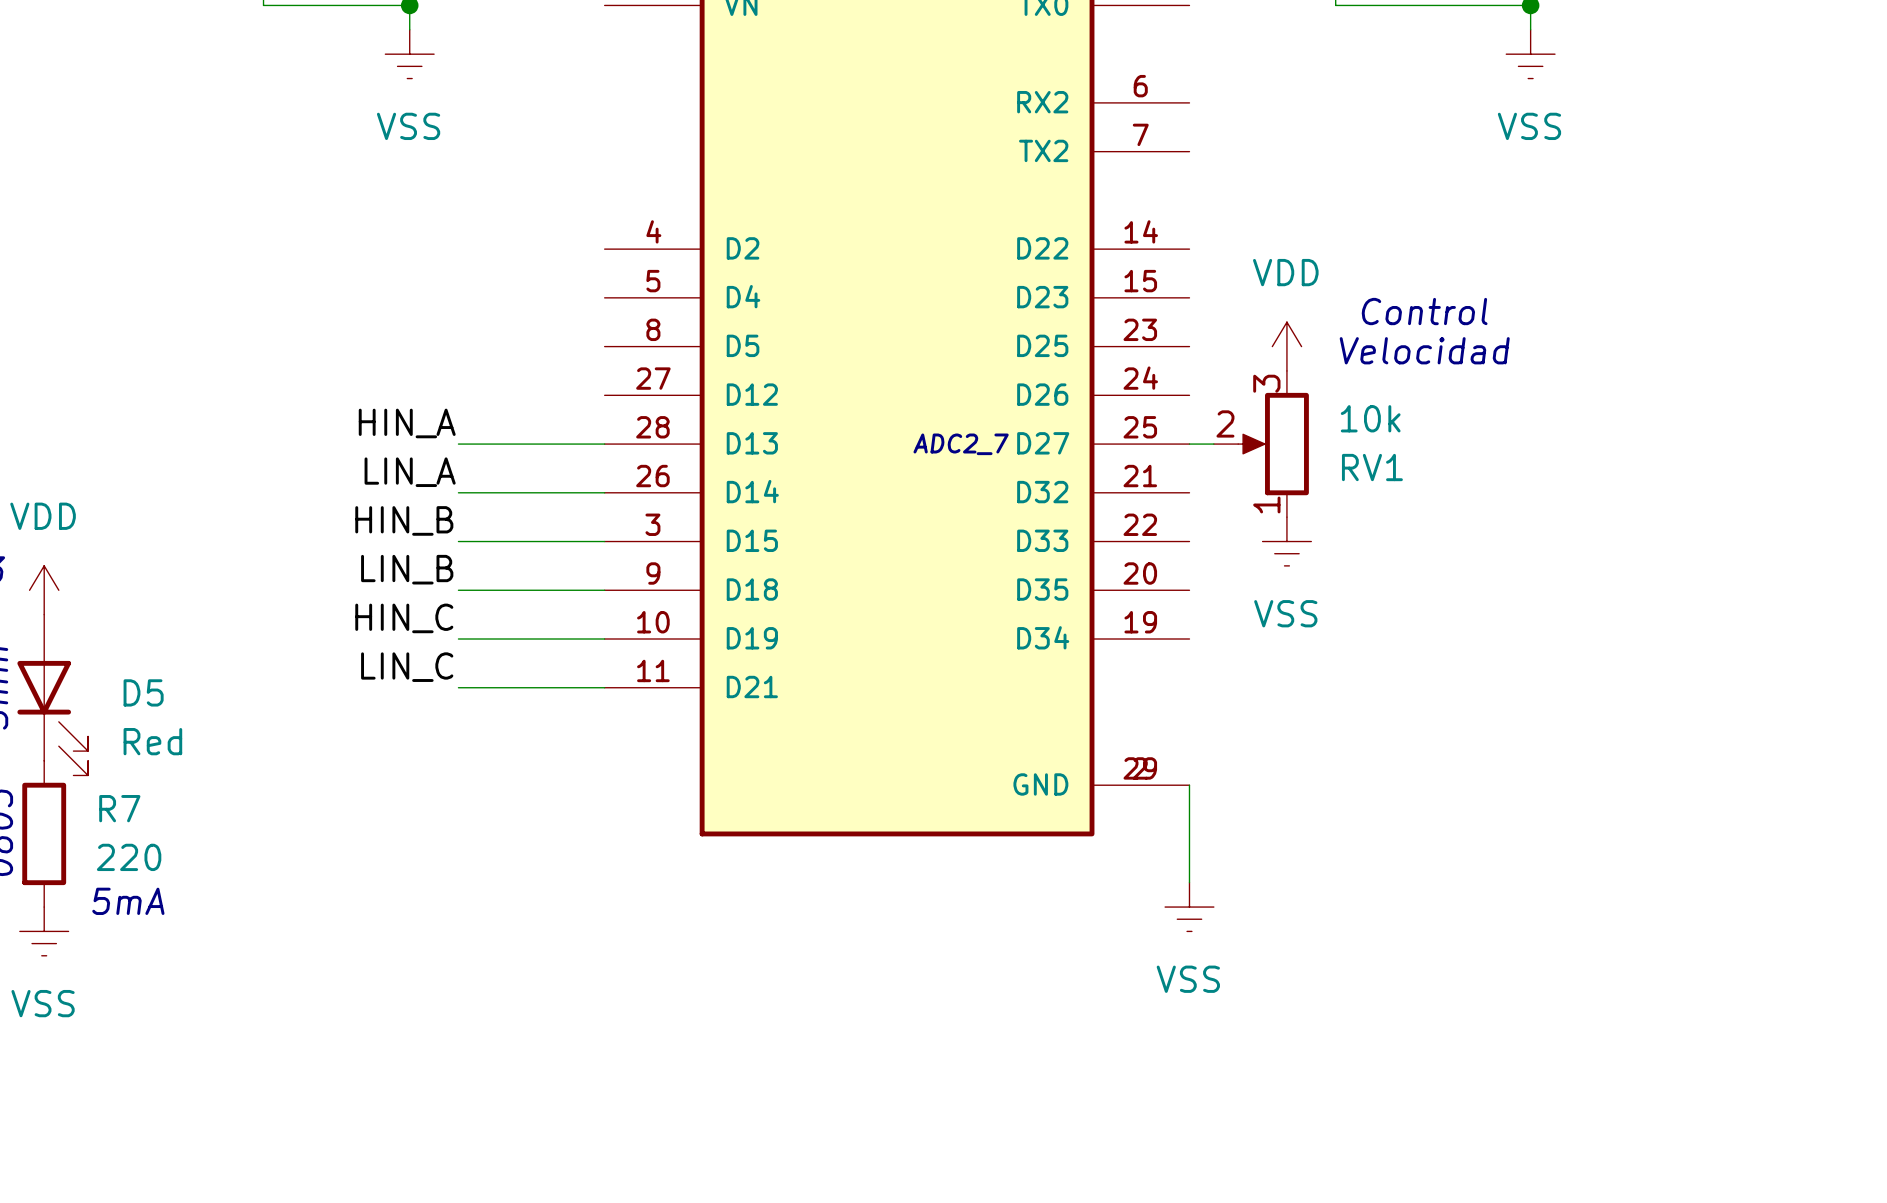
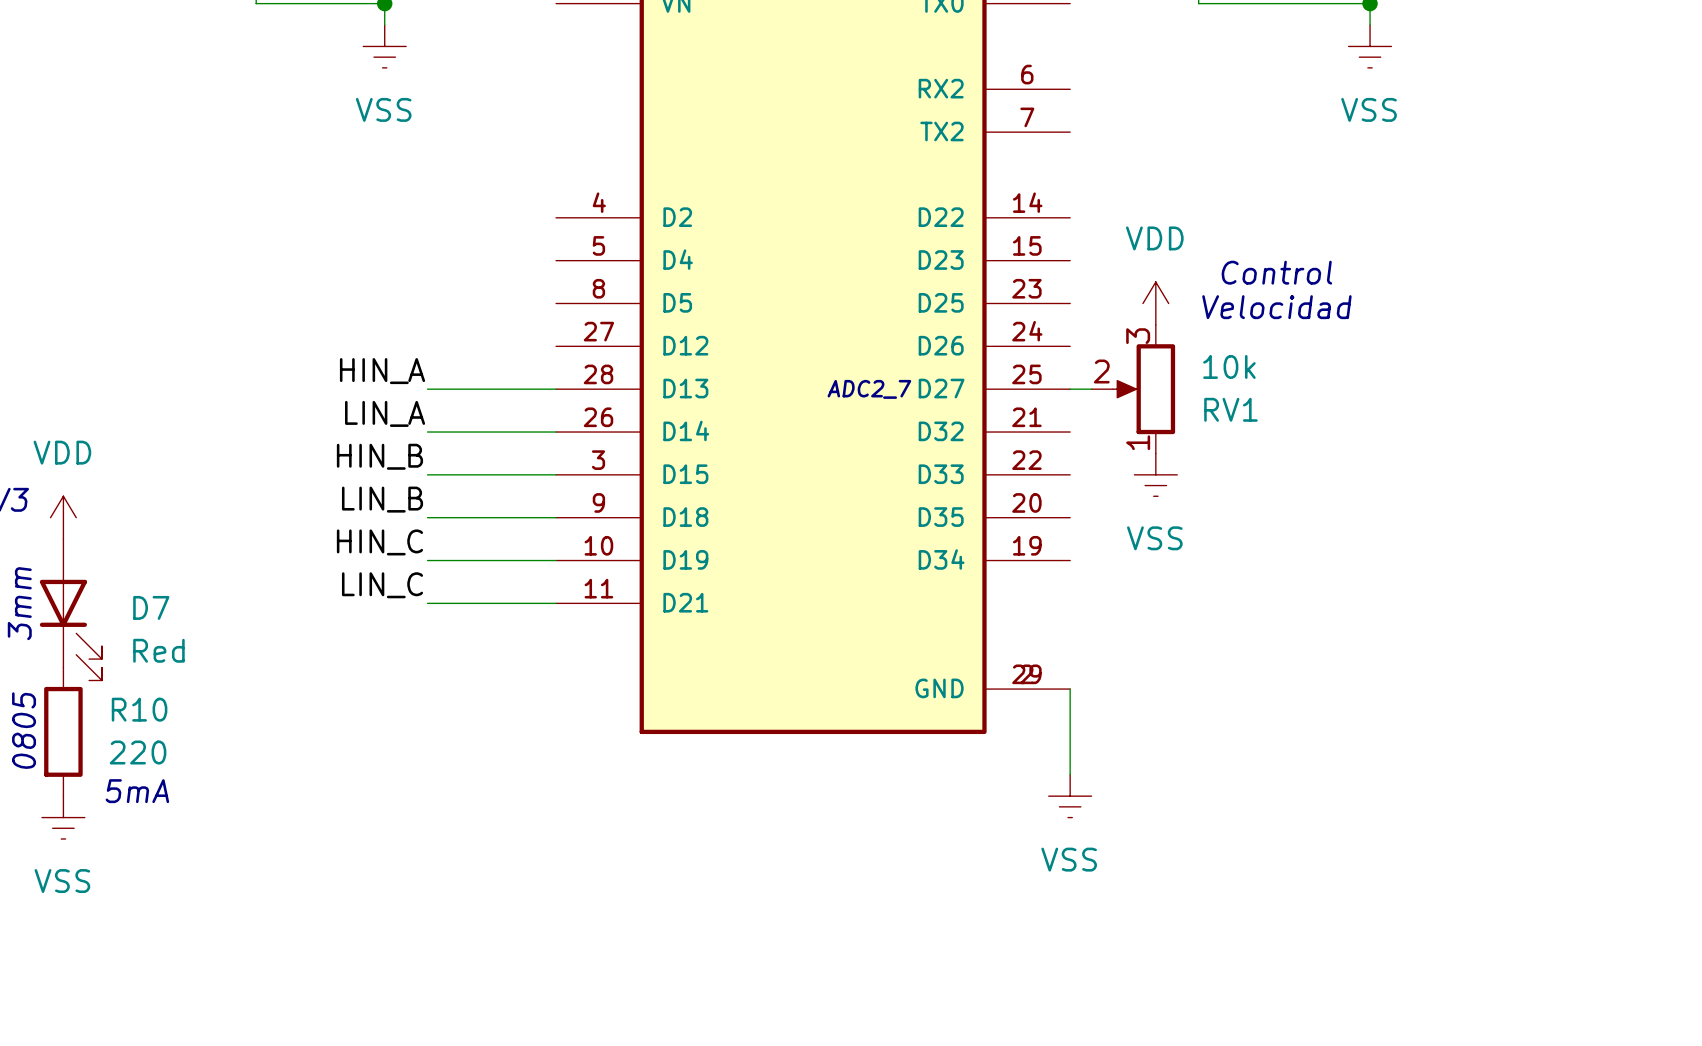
D5 name: D5 (143, 692) -> D7 (151, 607)
R7 name: R7 (119, 808) -> R10 (139, 709)

